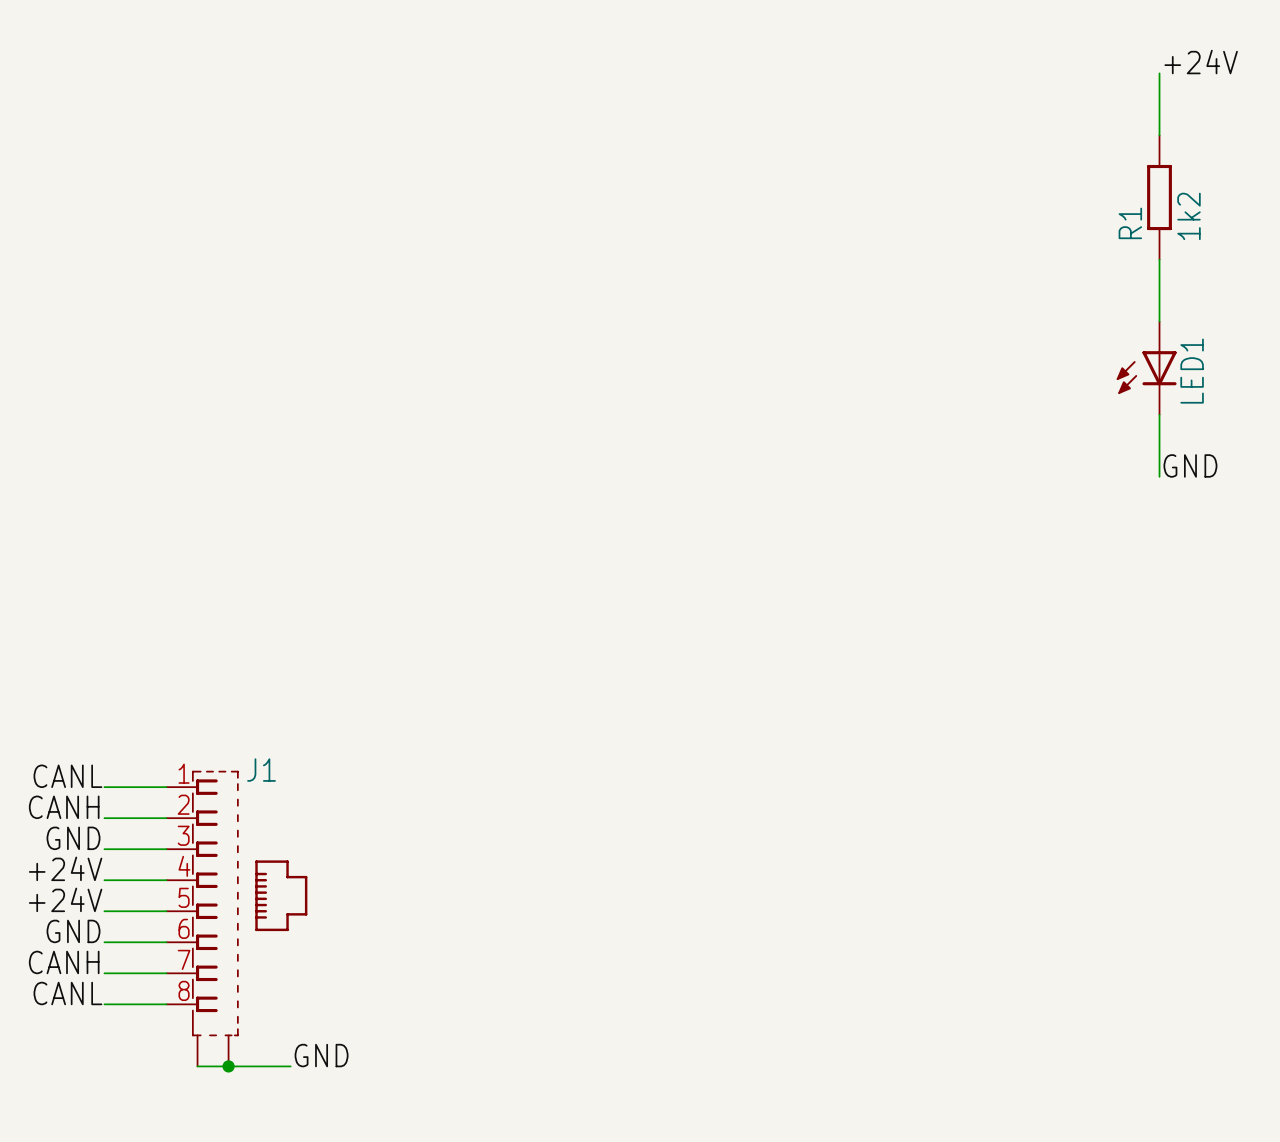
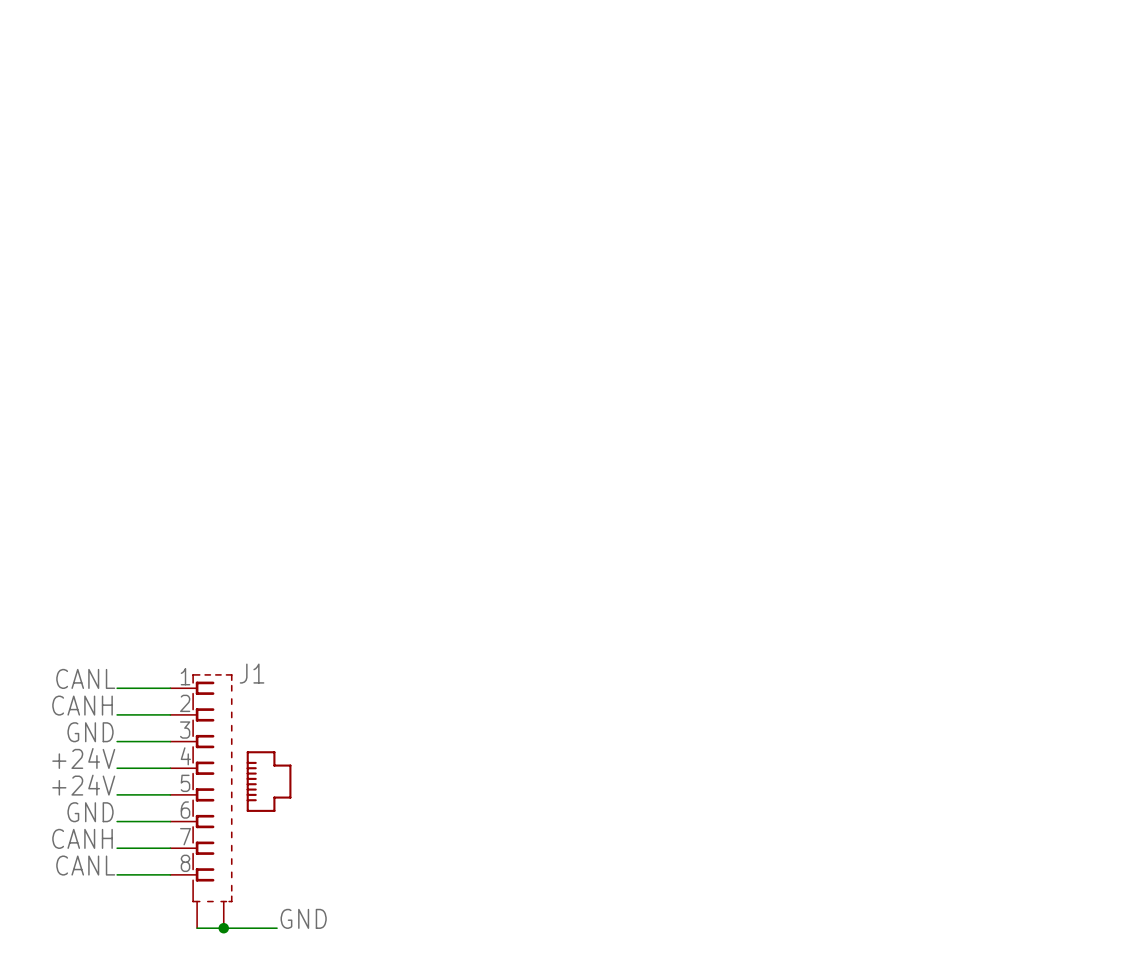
label: +24V (1201, 62) -> none
wire: (1159, 73) (1159, 135) -> none
R1: 1k2 (1159, 197) -> none
wire: (1159, 259) (1159, 321) -> none
LED1: (1146, 368) -> none
wire: (1159, 414) (1159, 476) -> none
label: GND (1190, 465) -> none

